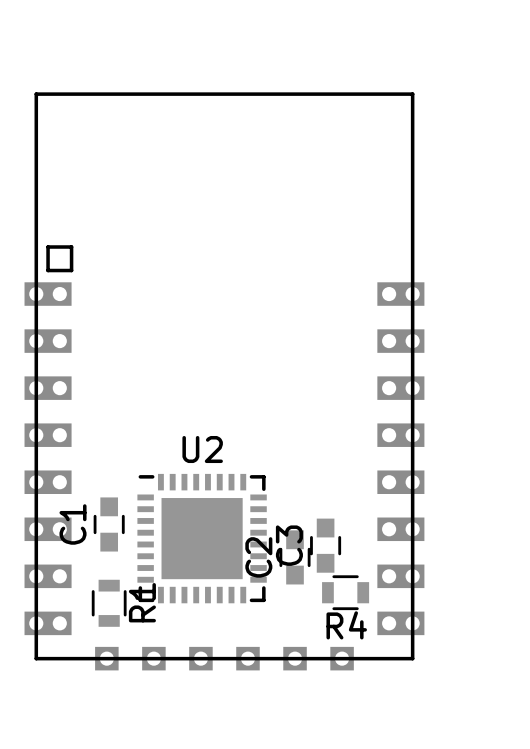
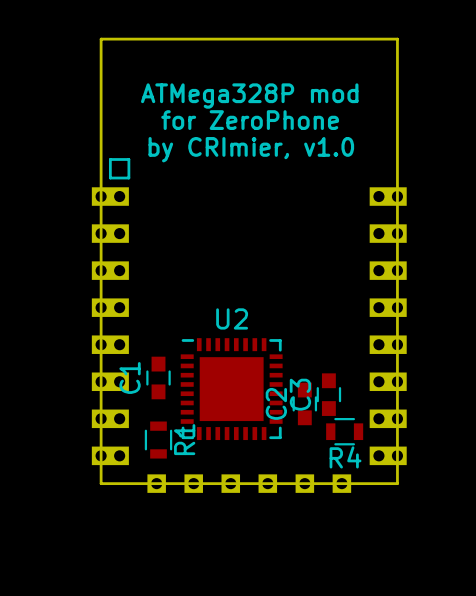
text: none -> ATMega328P mod (249, 96)
text: none -> for ZeroPhone (250, 120)
text: none -> by CRImier, v1.0 (251, 149)

